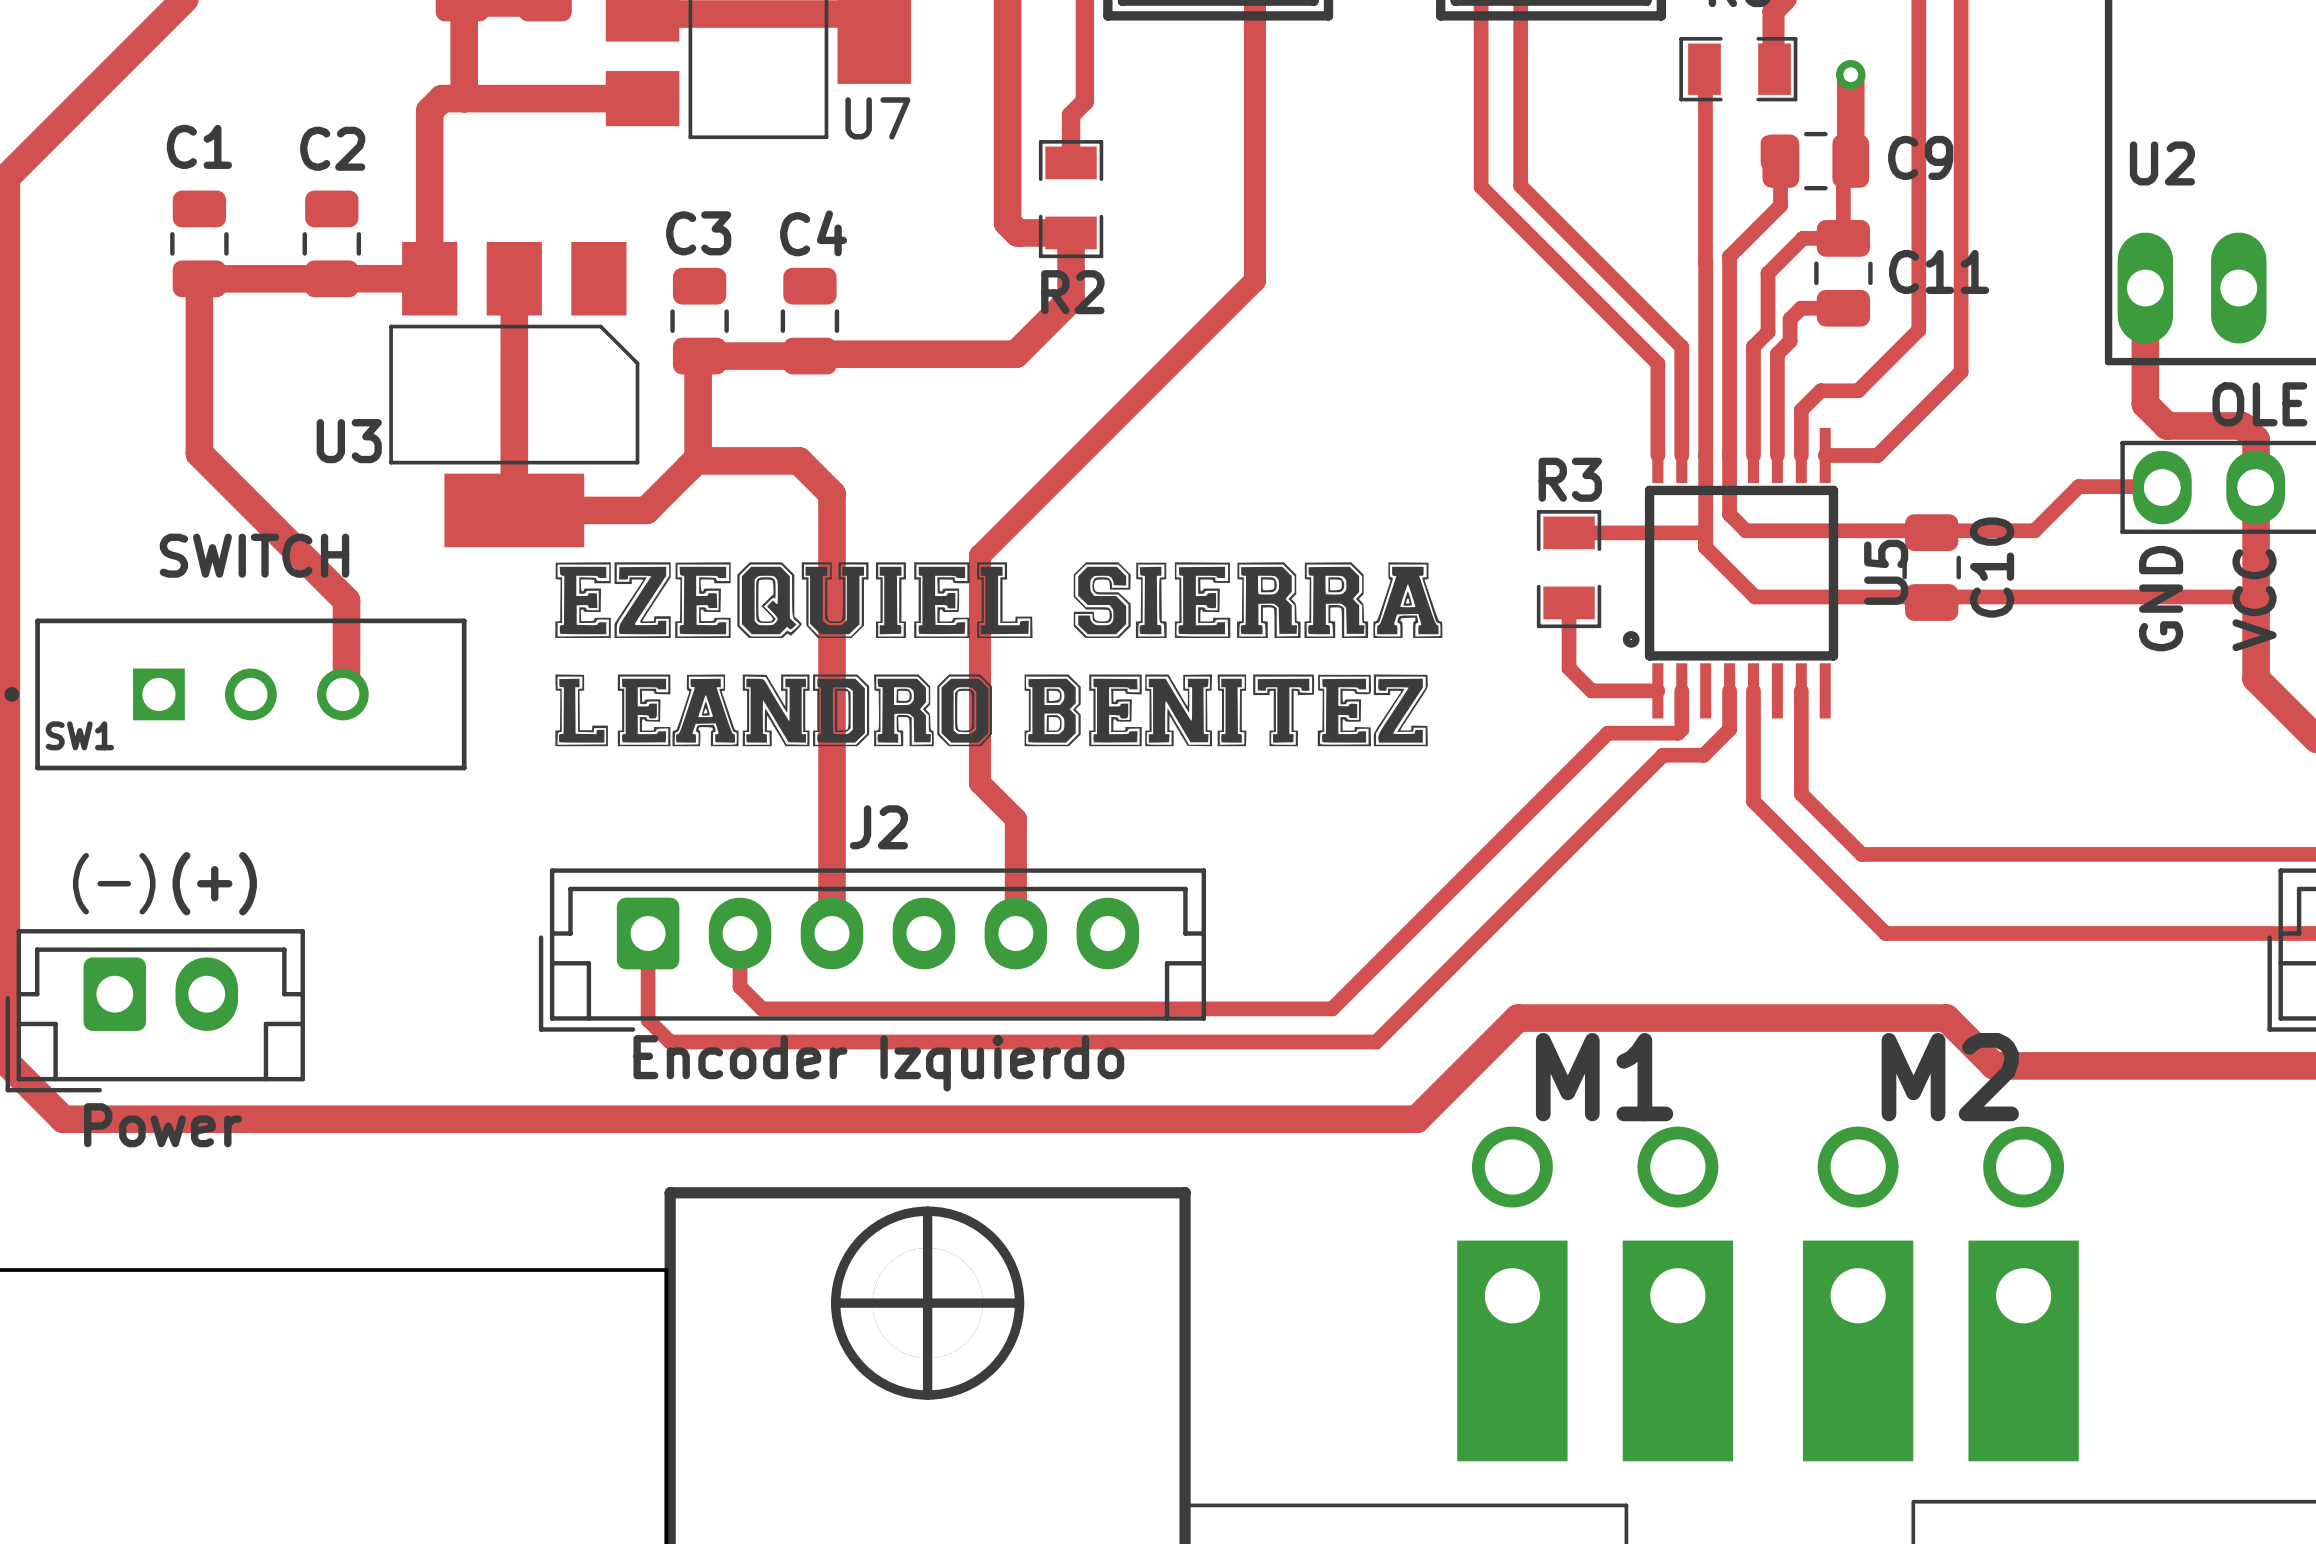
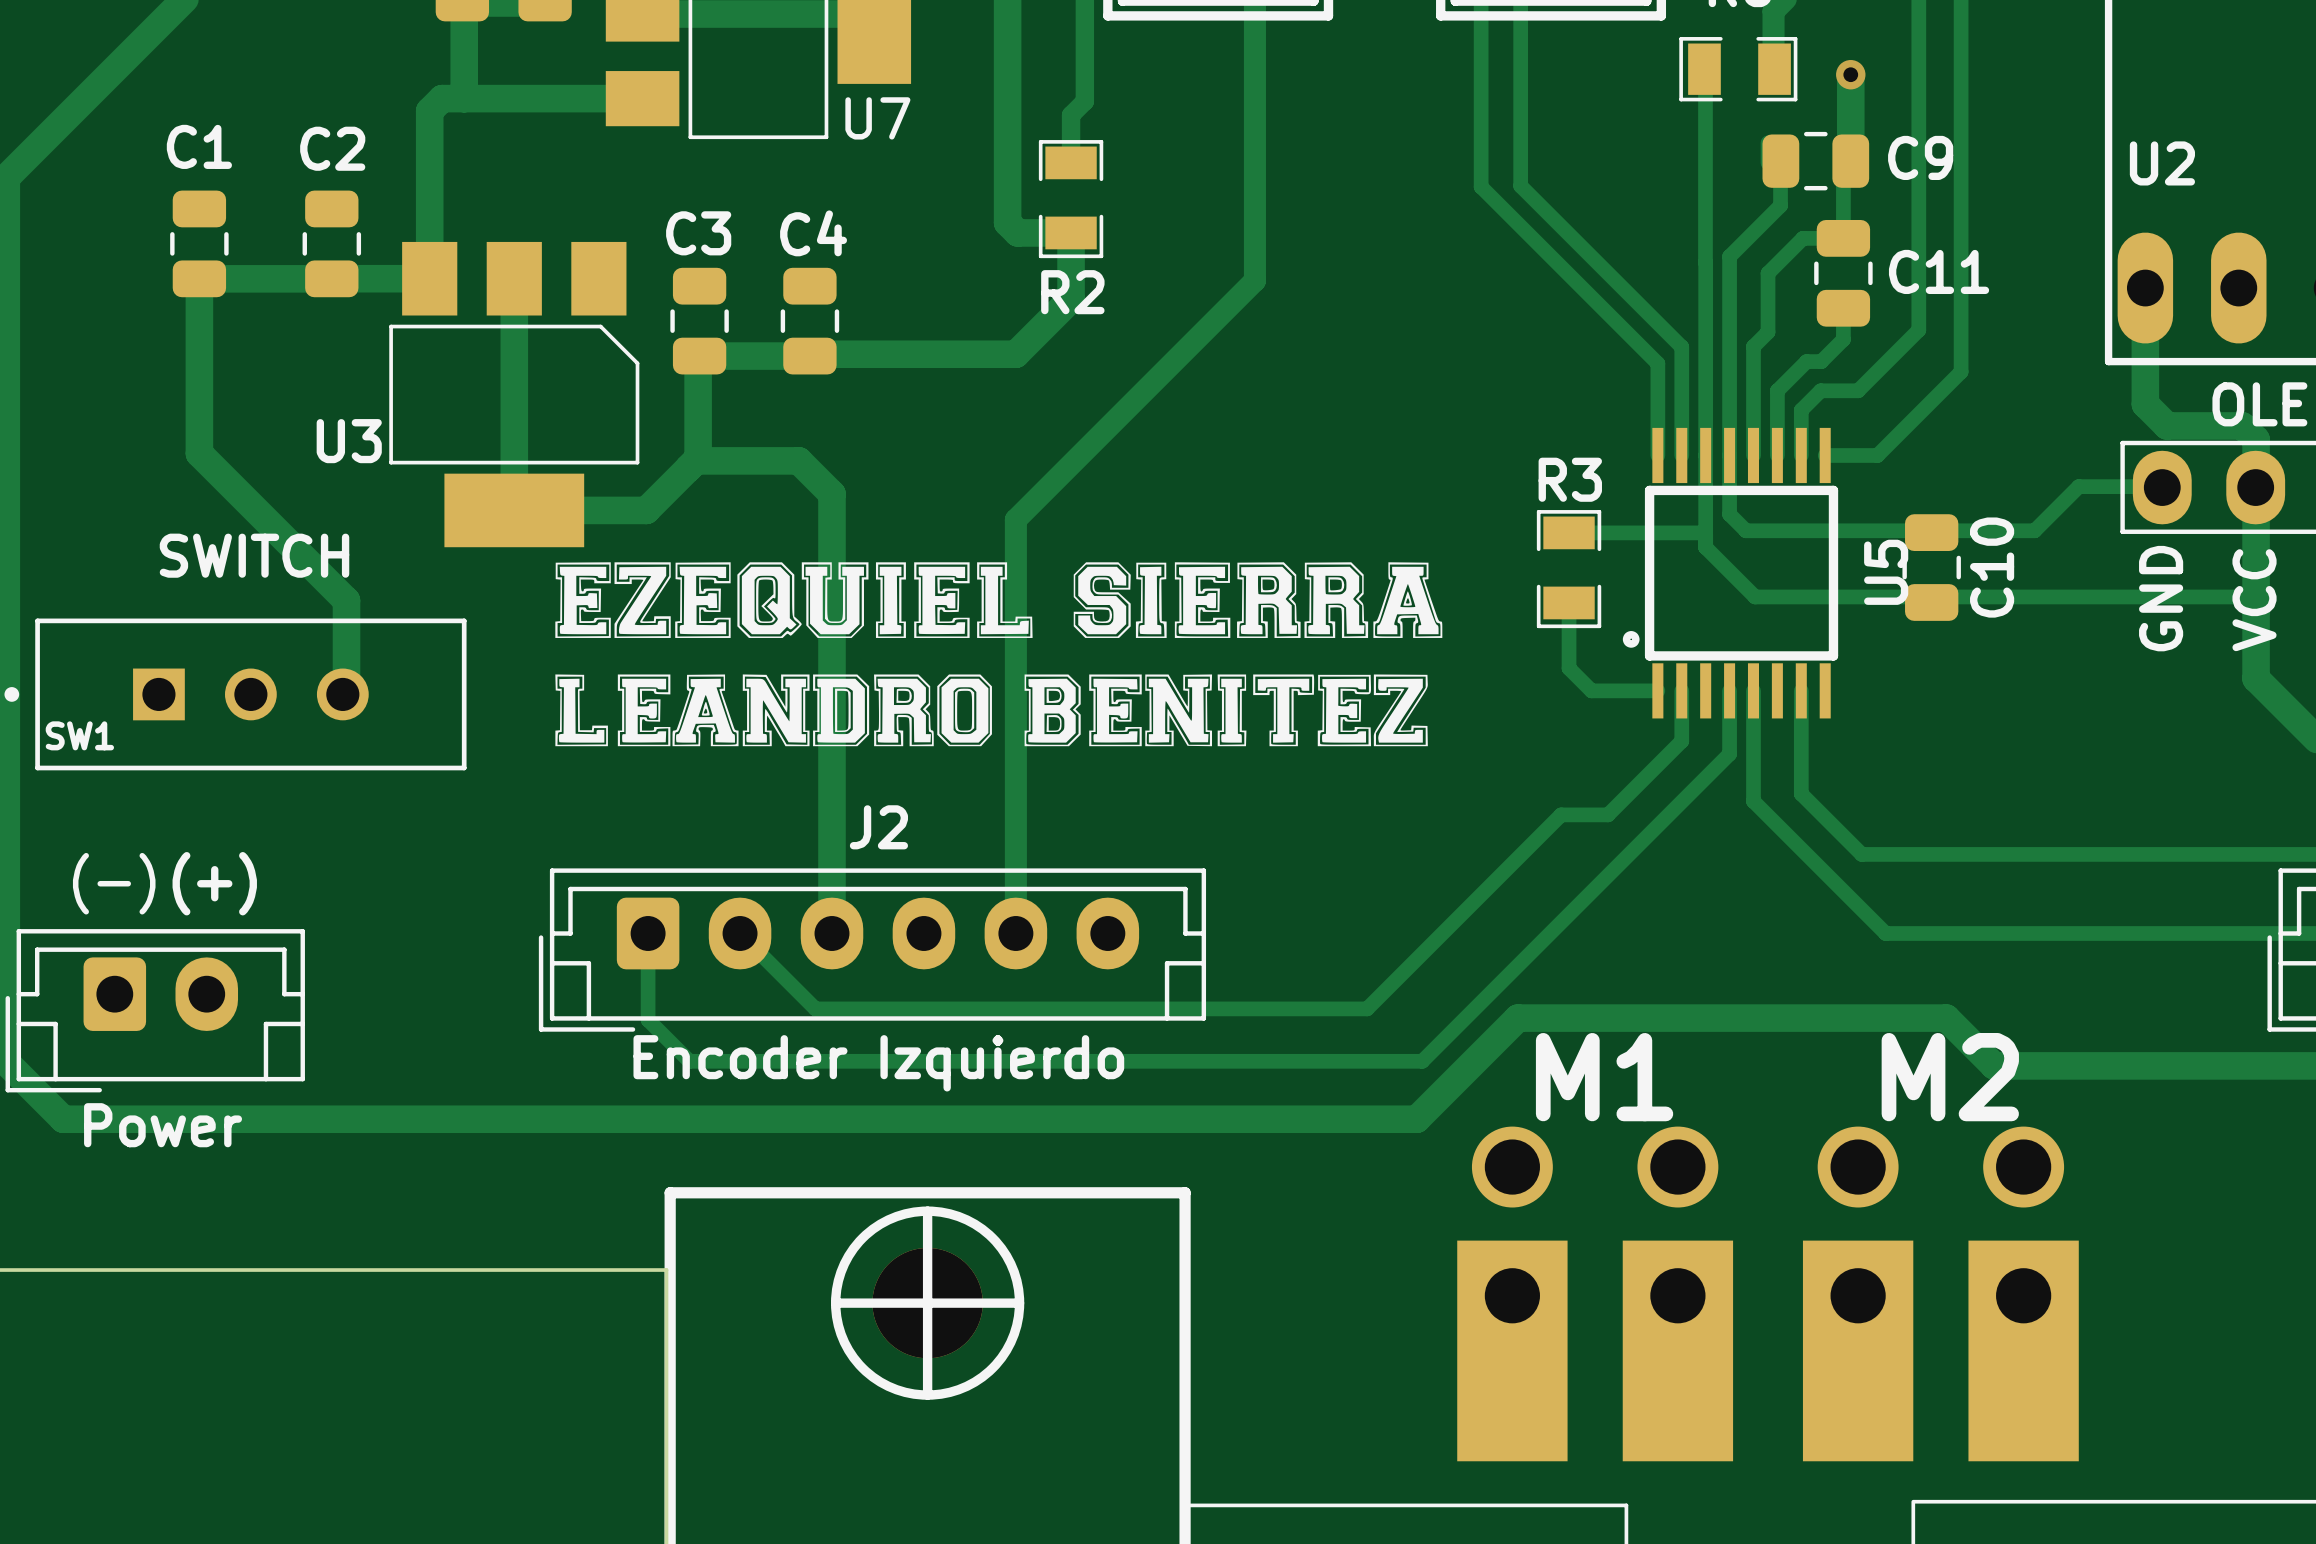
track: (1843, 308) (1801, 308) (1790, 319) (1790, 341) (1777, 353) (1777, 390) -> (1843, 308) (1843, 339) (1821, 361) (1806, 361) (1777, 390)
track: (1015, 519) (979, 555) (979, 783) (1015, 819) -> (1015, 519) (1015, 819)
track: (1681, 729) (1678, 733) (1607, 733) (1332, 1008) -> (1681, 729) (1681, 741) (1608, 814) (1561, 814) (1367, 1008) (1332, 1008)
track: (1729, 729) (1703, 755) (1663, 755) (1376, 1041) (670, 1041) -> (1729, 729) (1729, 754) (1422, 1061) (689, 1061) (670, 1041)
track: (740, 933) (740, 986) (762, 1008) (815, 1008) -> (740, 933) (815, 1008)

